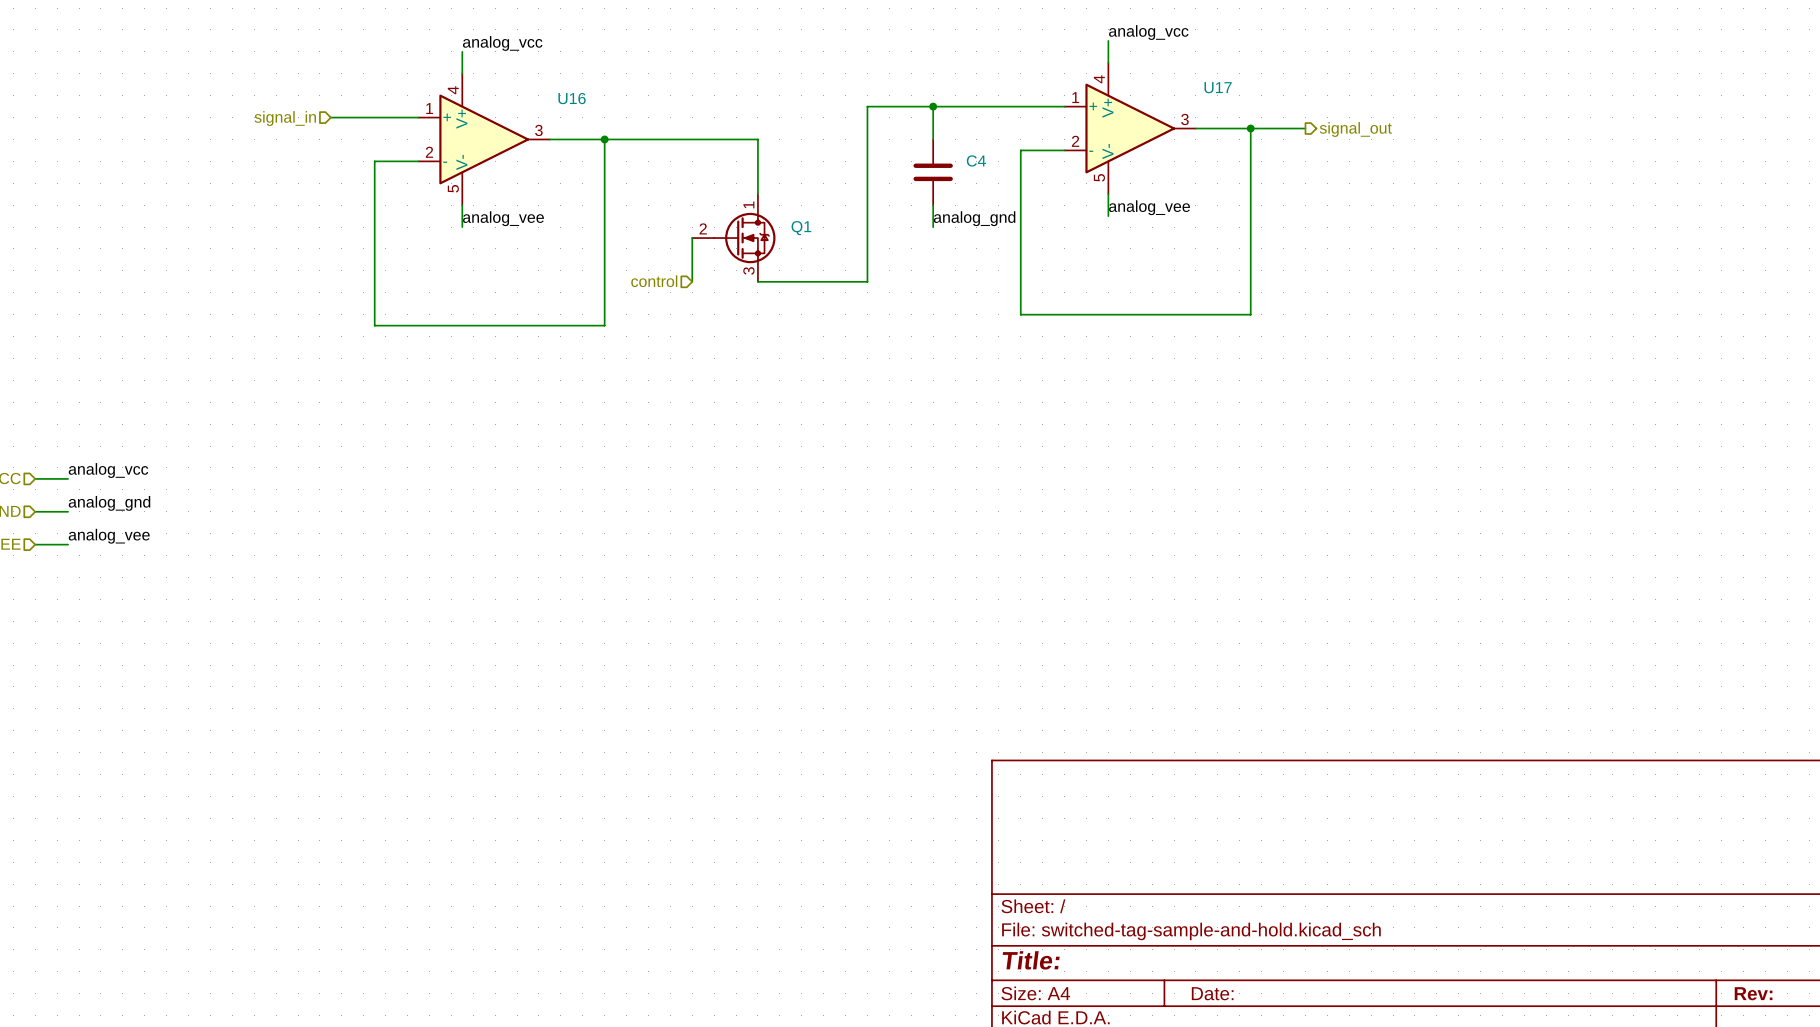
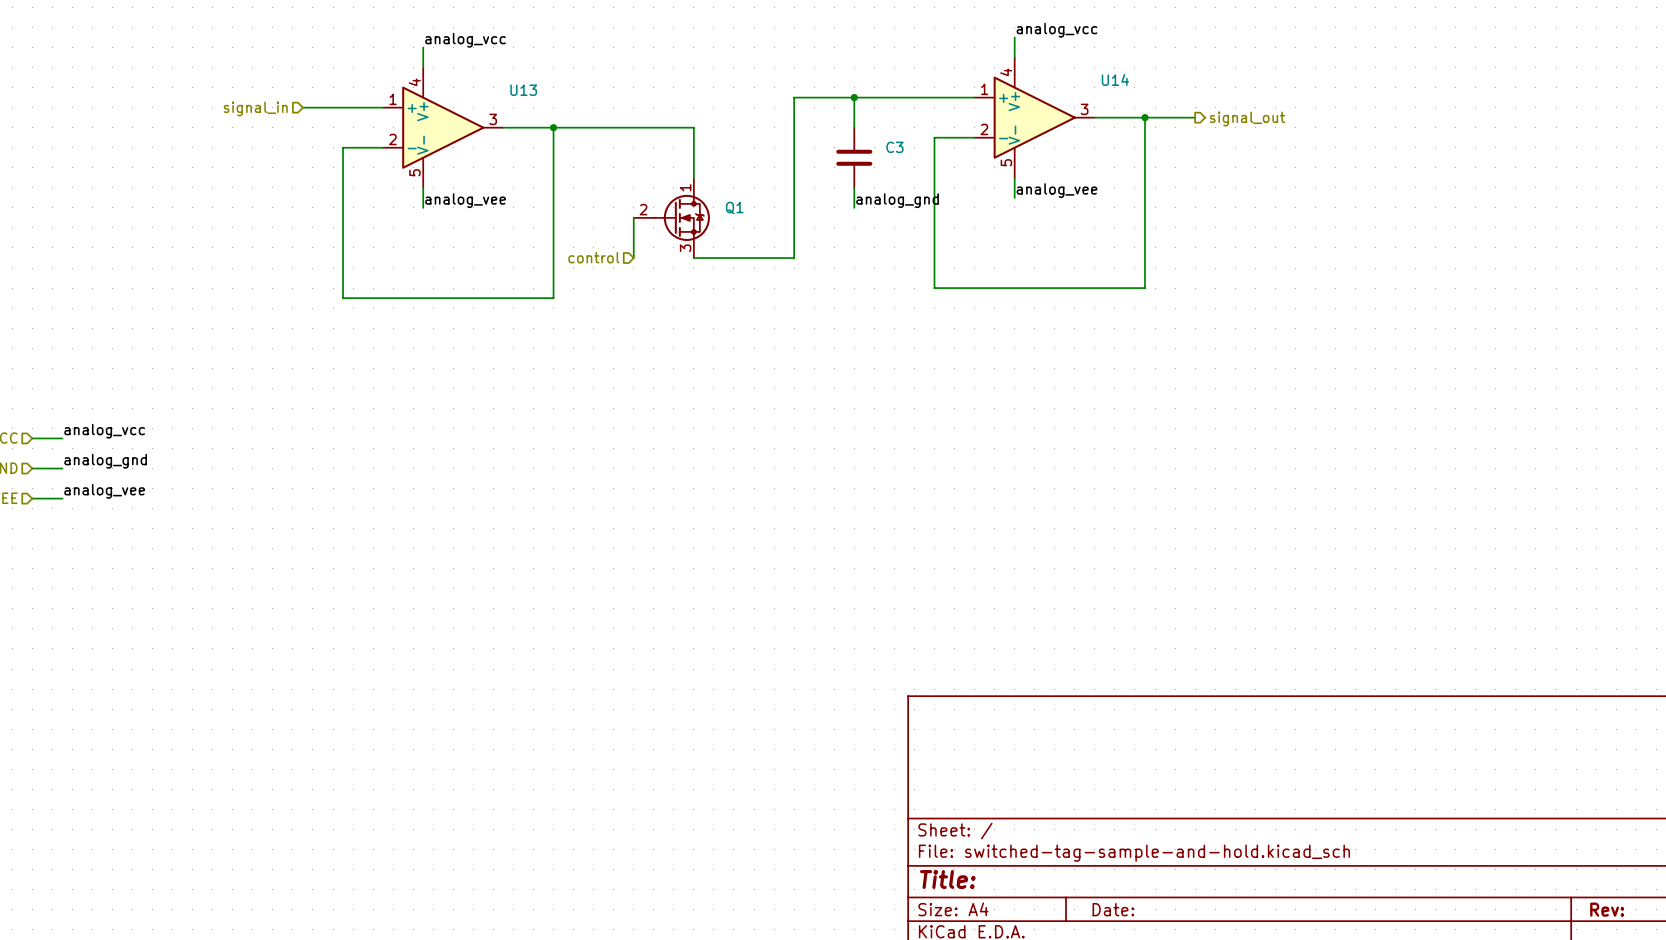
U17 name: U17 (1218, 87) -> U14 (1115, 79)
U16 name: U16 (572, 98) -> U13 (523, 90)
C4 name: C4 (976, 160) -> C3 (894, 147)

